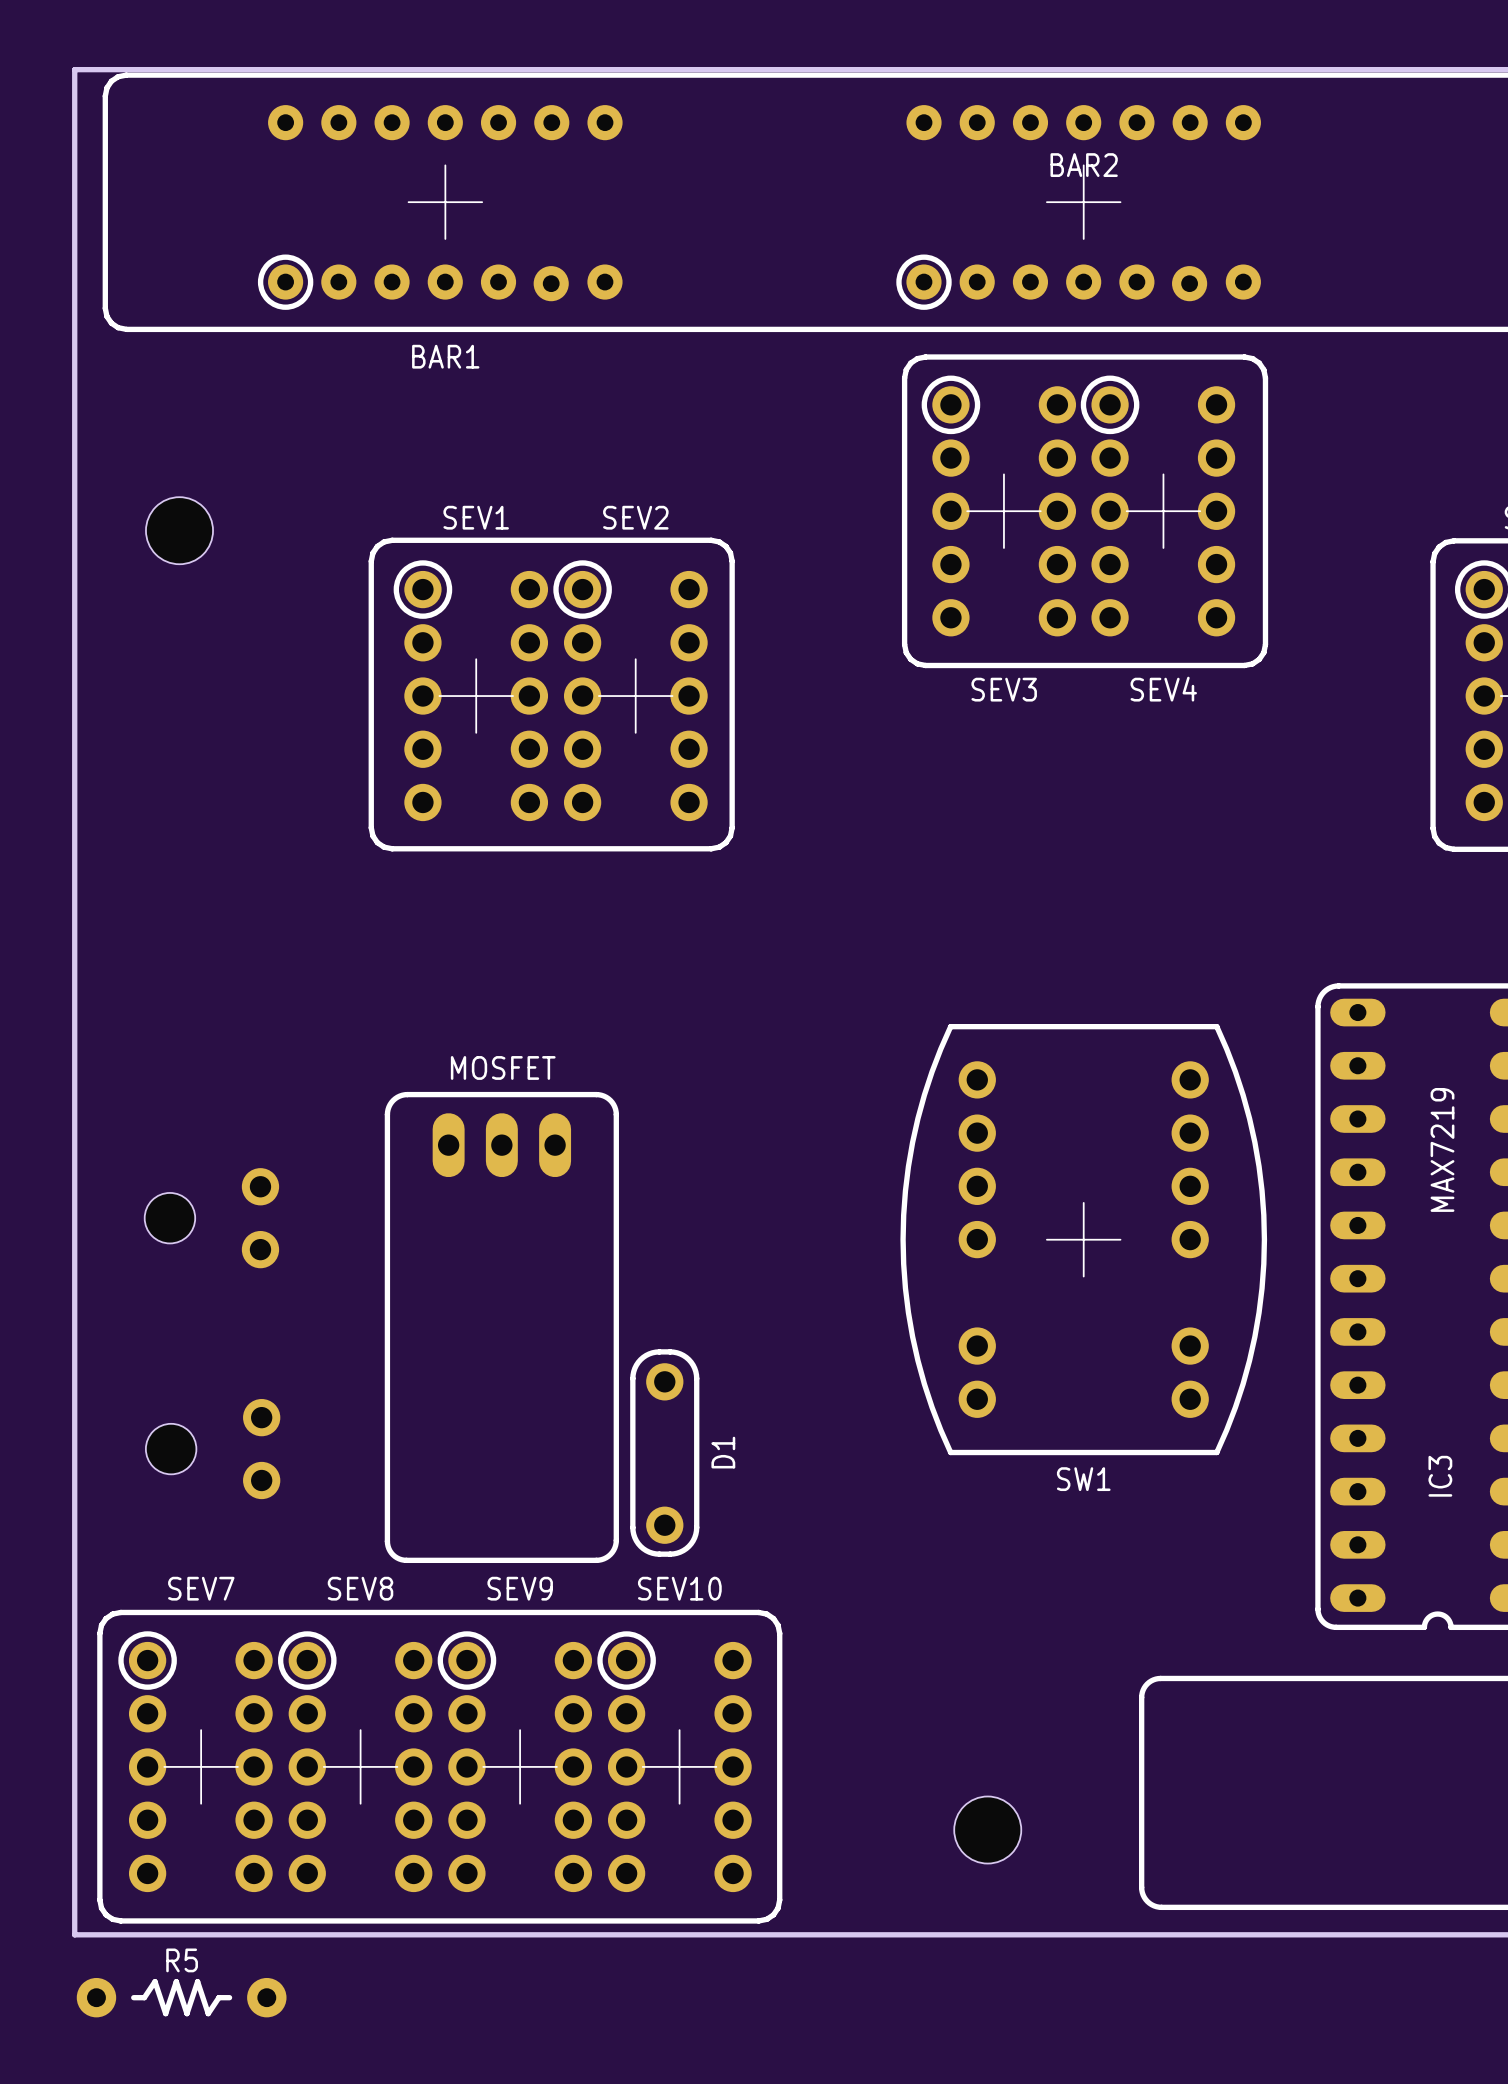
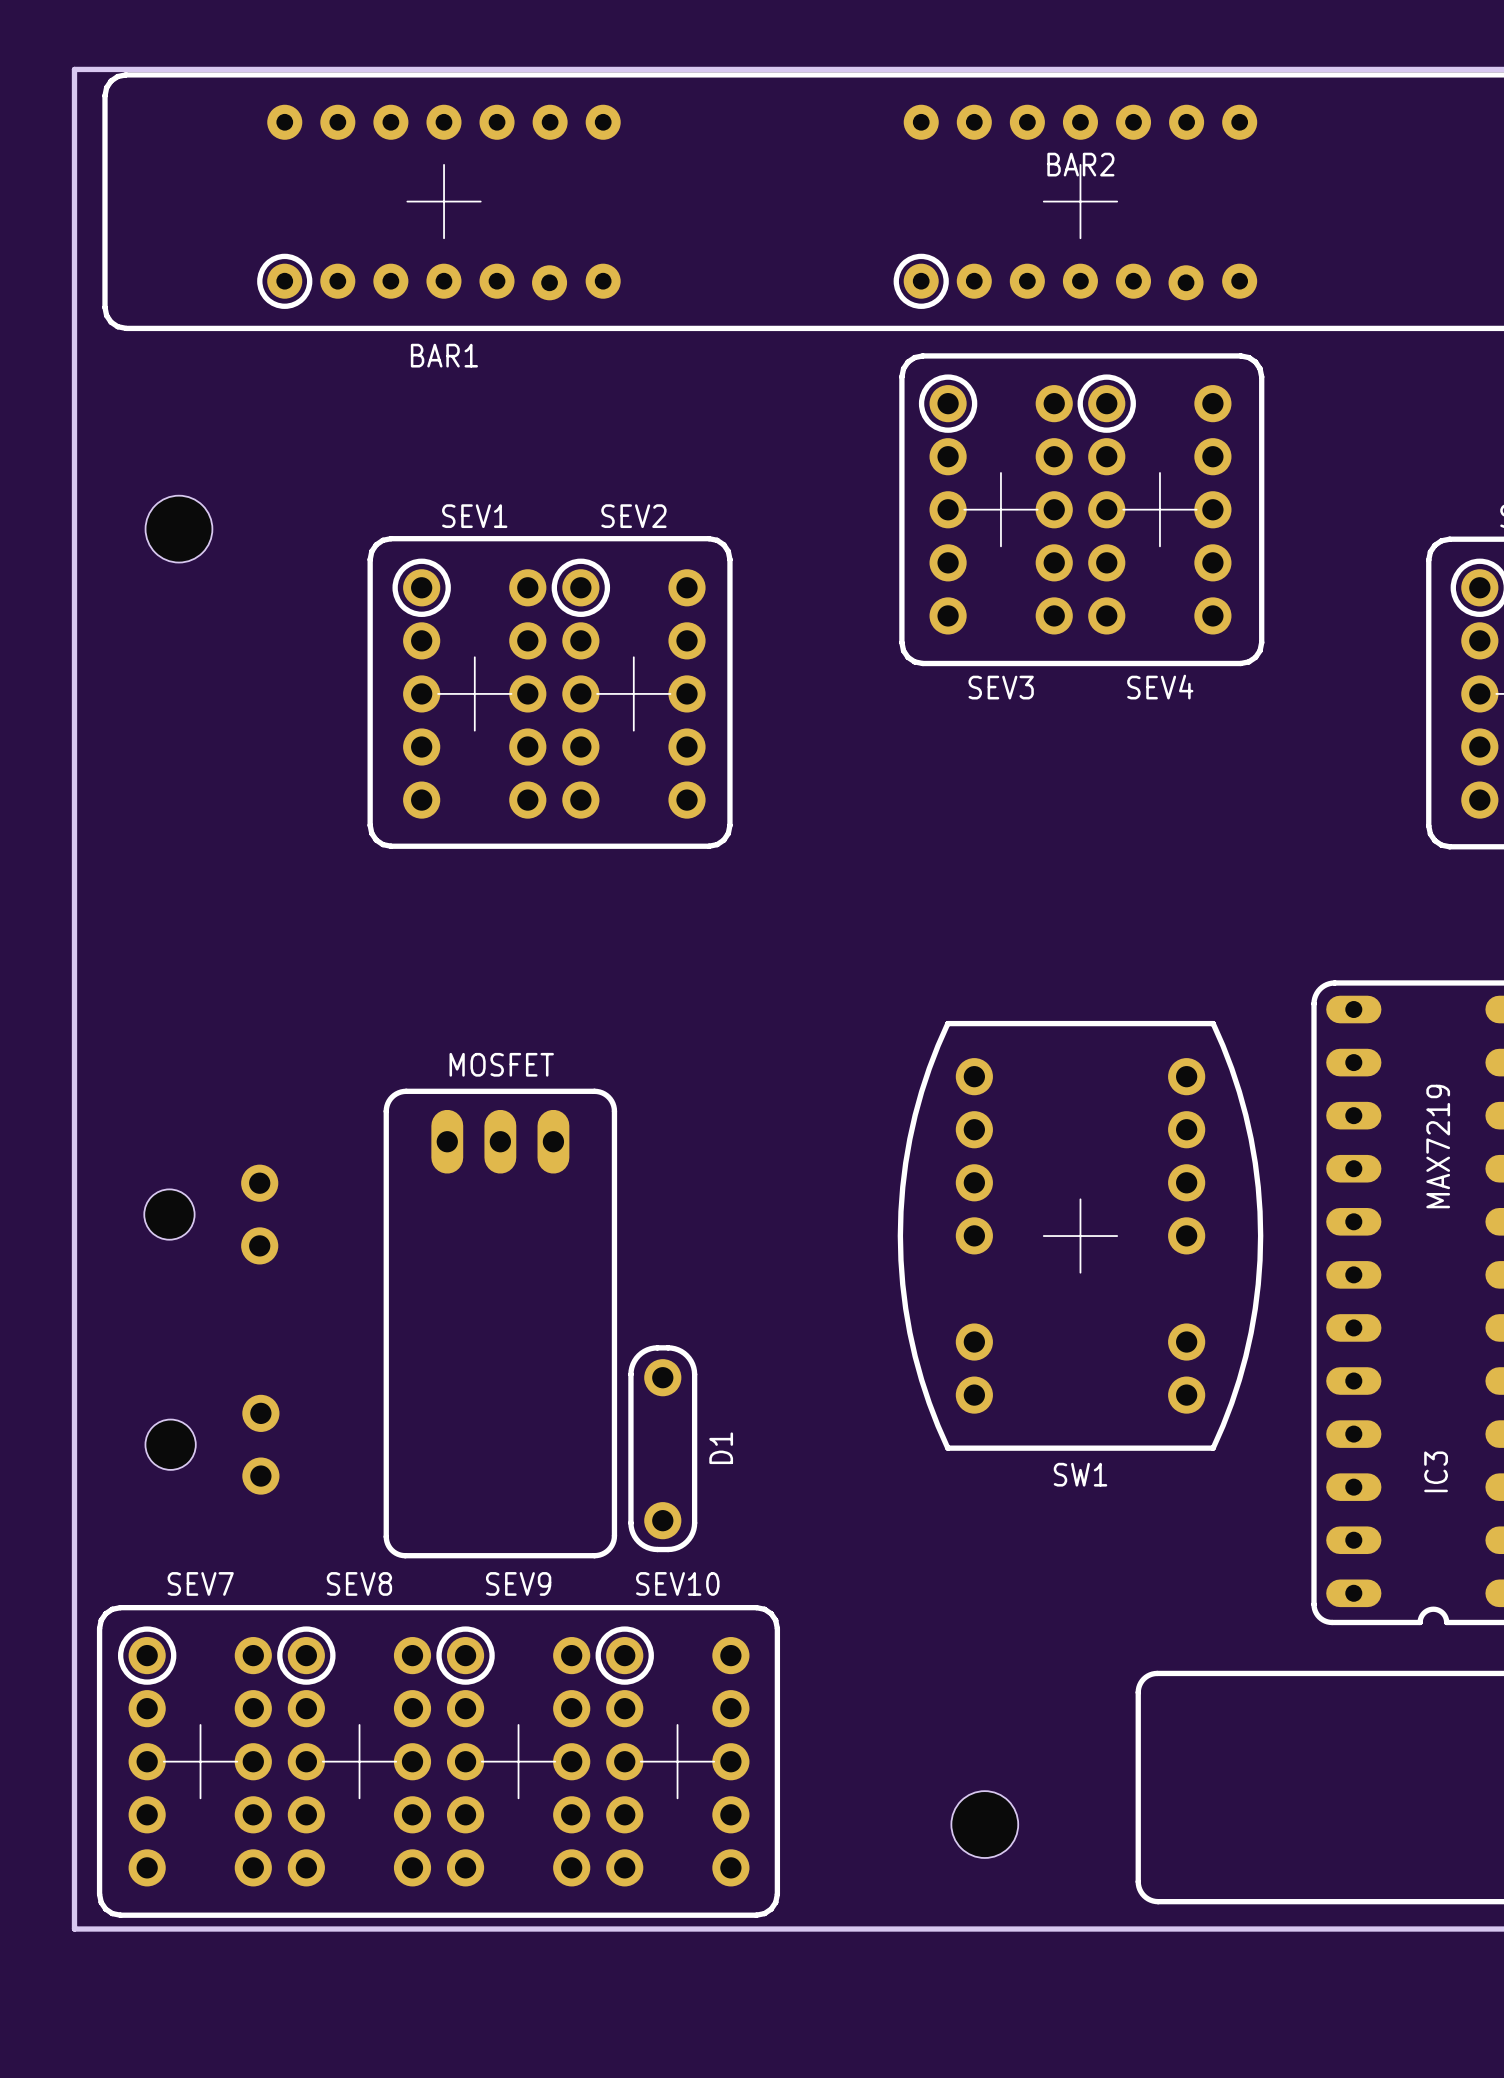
R5: (181, 1997) -> none

